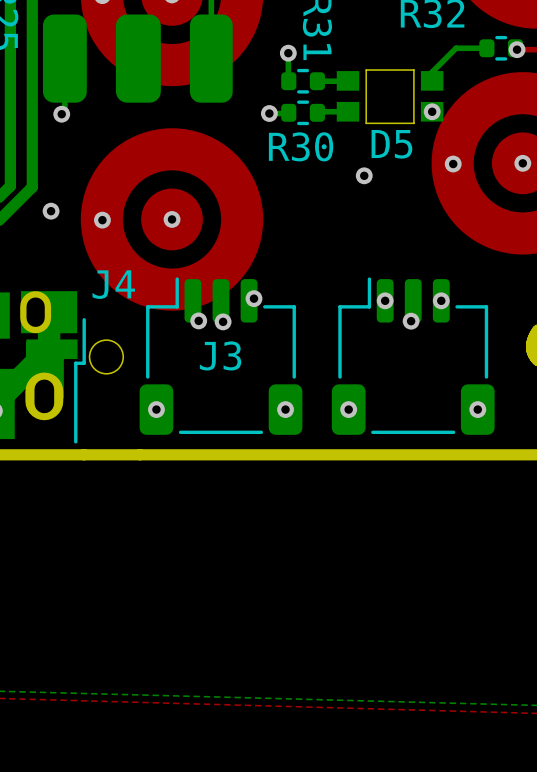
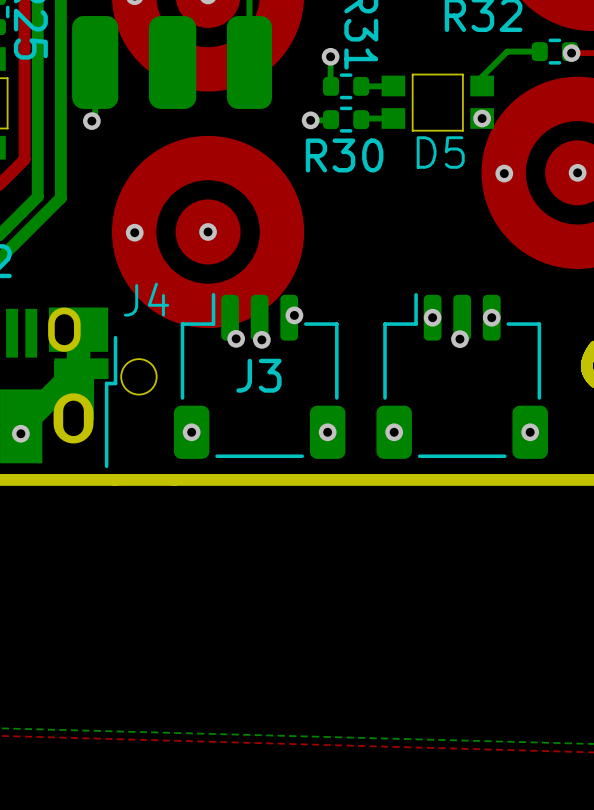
via: (364, 175) -> none
via: (51, 211) -> none

